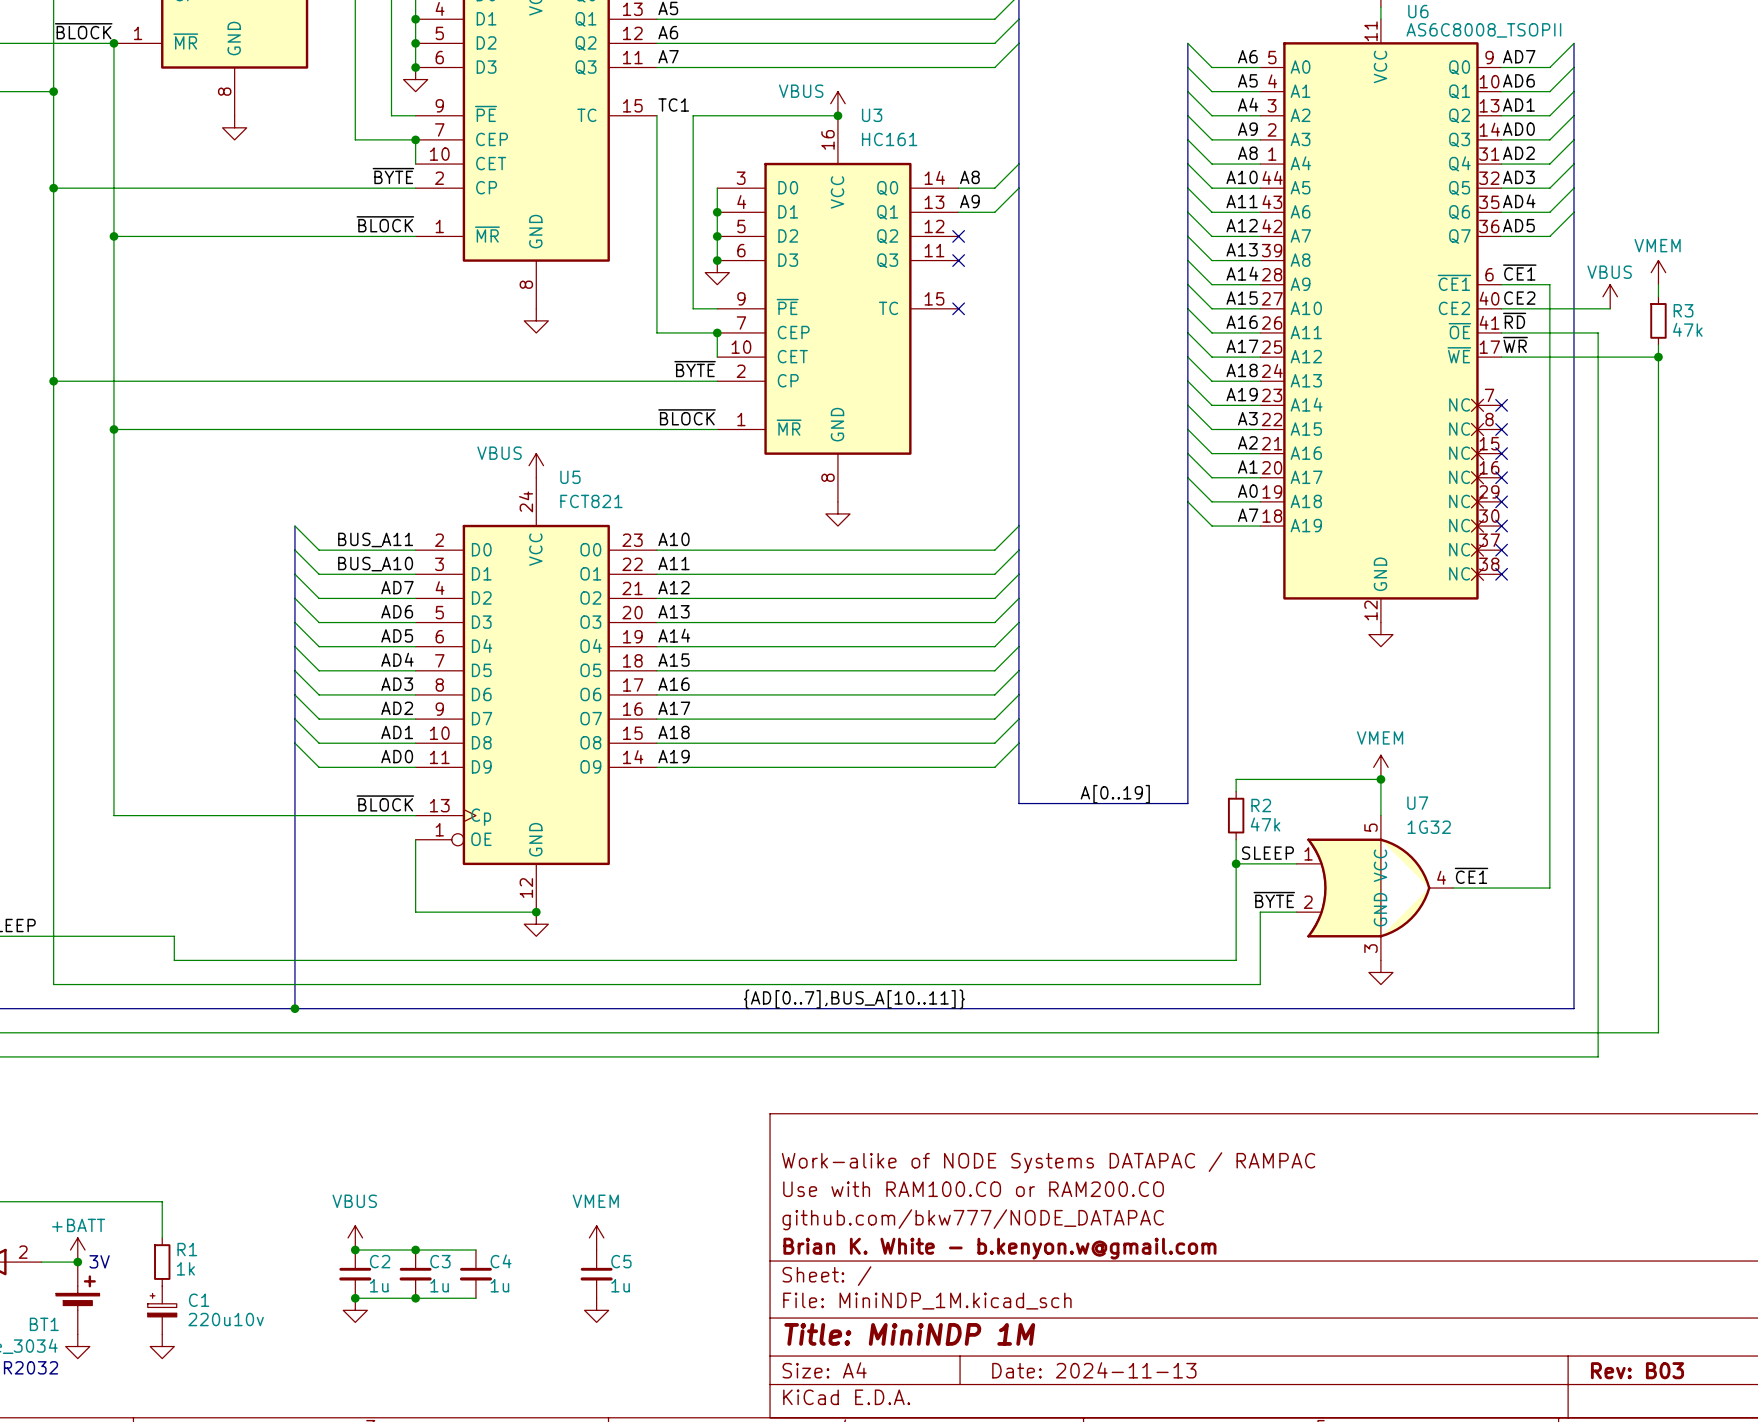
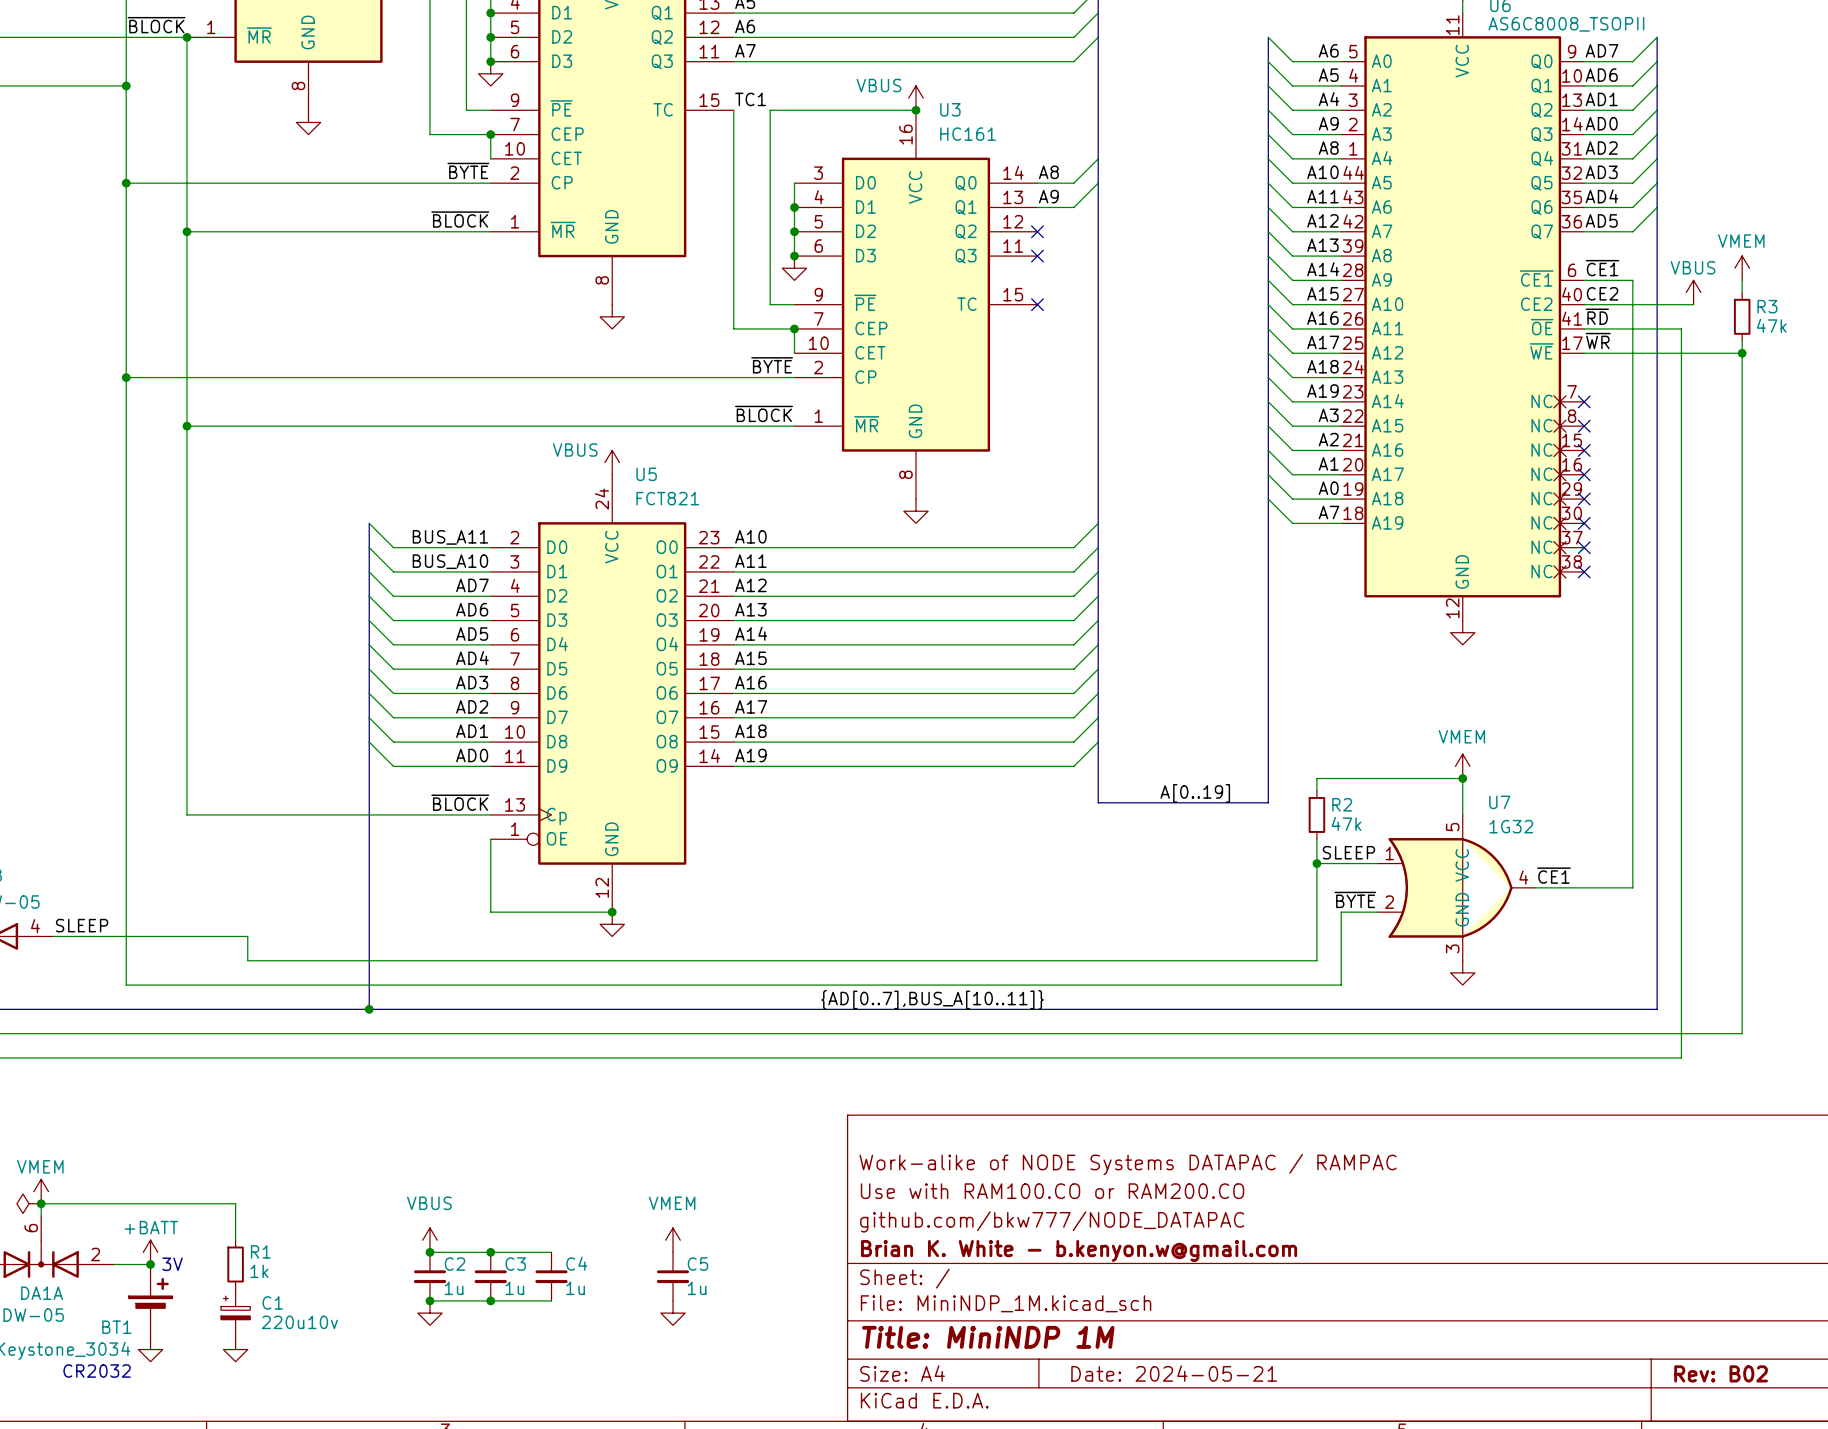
title block: Date: 2024-11-13 (1094, 1370) -> Date: 2024-05-21 (1174, 1373)
title block: Rev: B03 (1637, 1370) -> Rev: B02 (1721, 1373)

